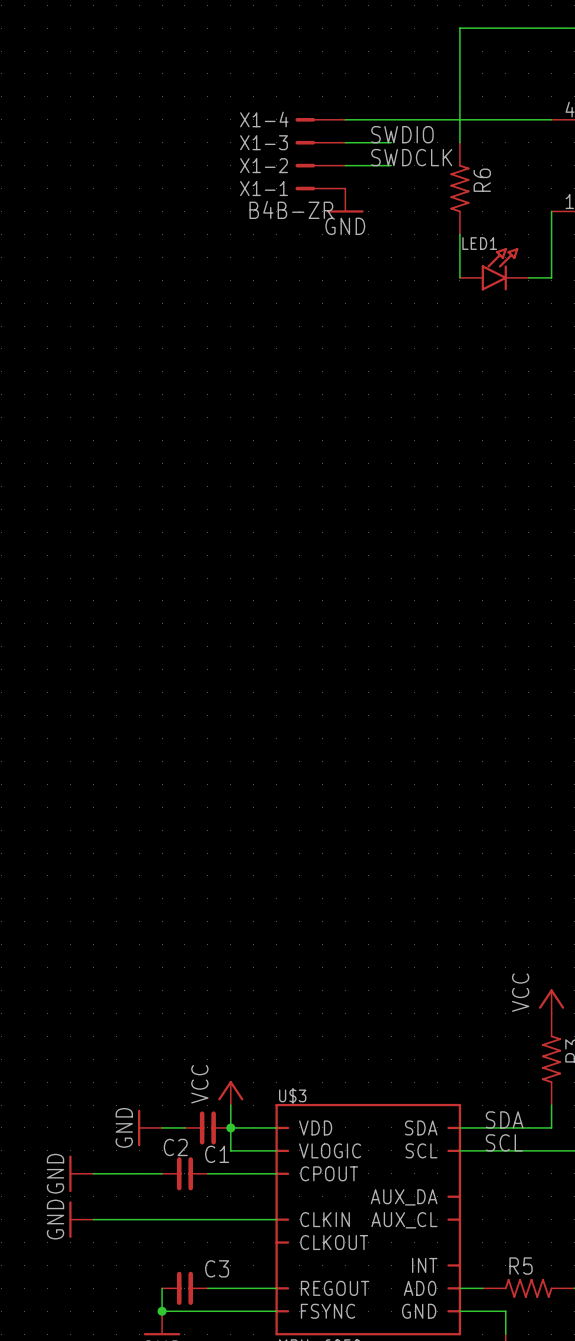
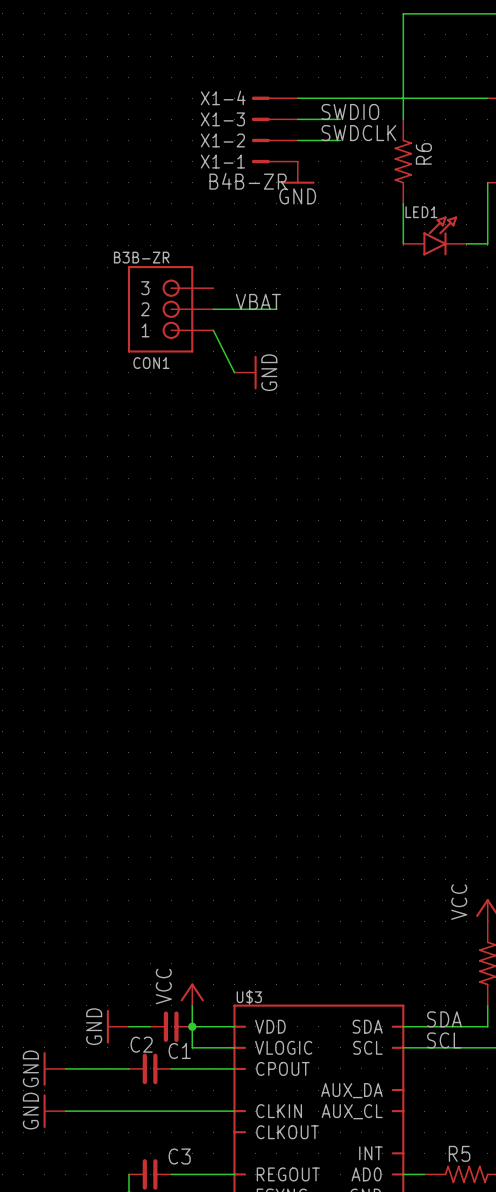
label: none -> VBAT (258, 301)
CON1: none -> B3B-ZR (170, 309)
wire: none -> (213, 309) (276, 309)
wire: none -> (213, 330) (234, 372)
power symbol: none -> GND (245, 372)

